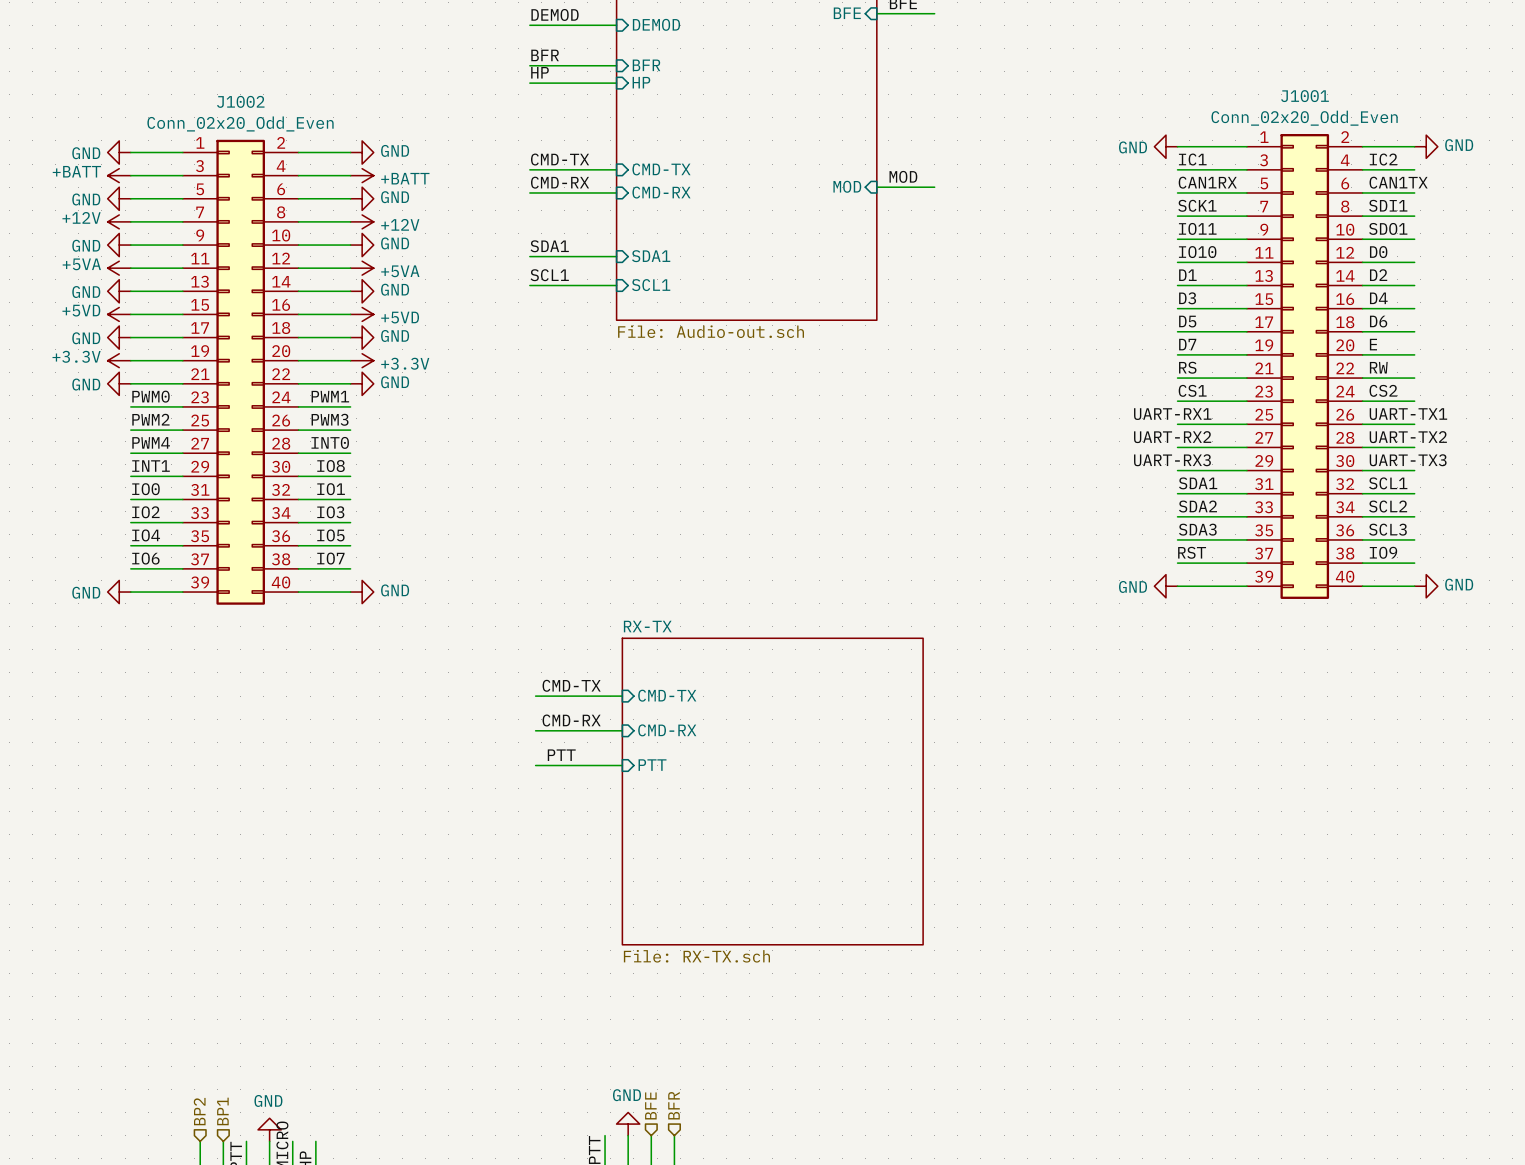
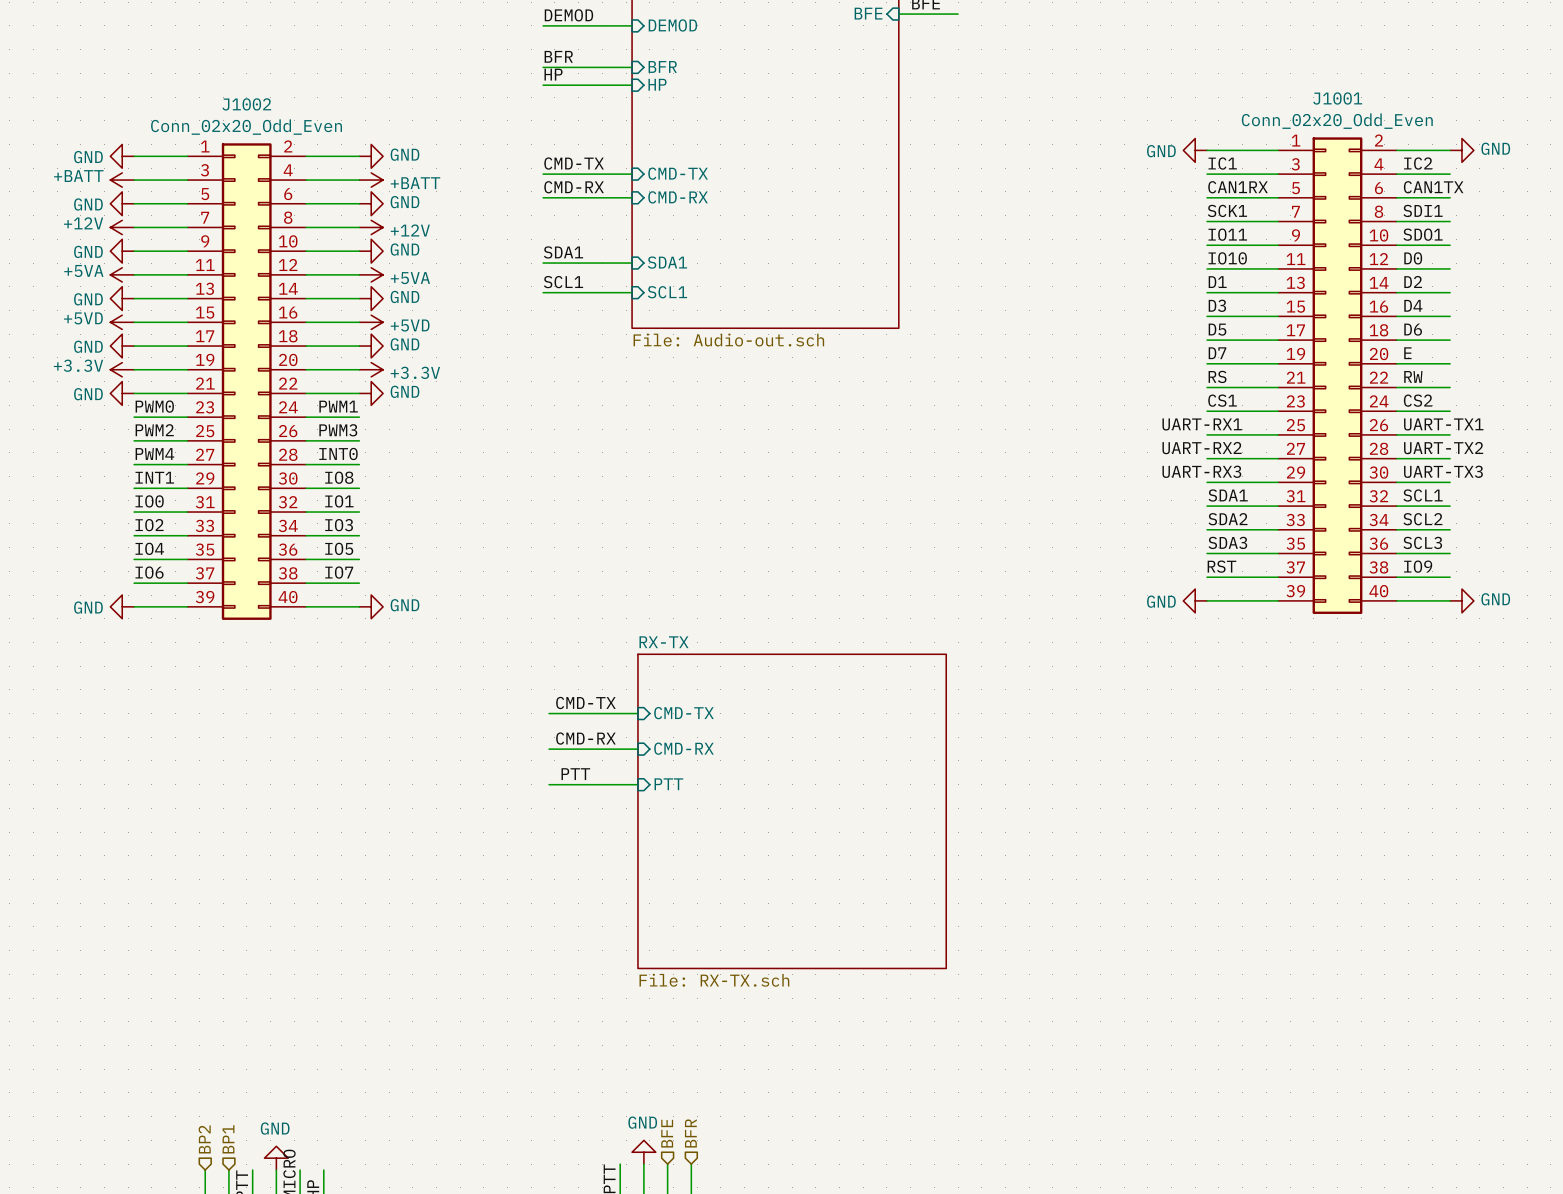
label: MOD (903, 176) -> none
sheet pin: MOD (847, 186) -> none
wire: (876, 187) (934, 187) -> none

